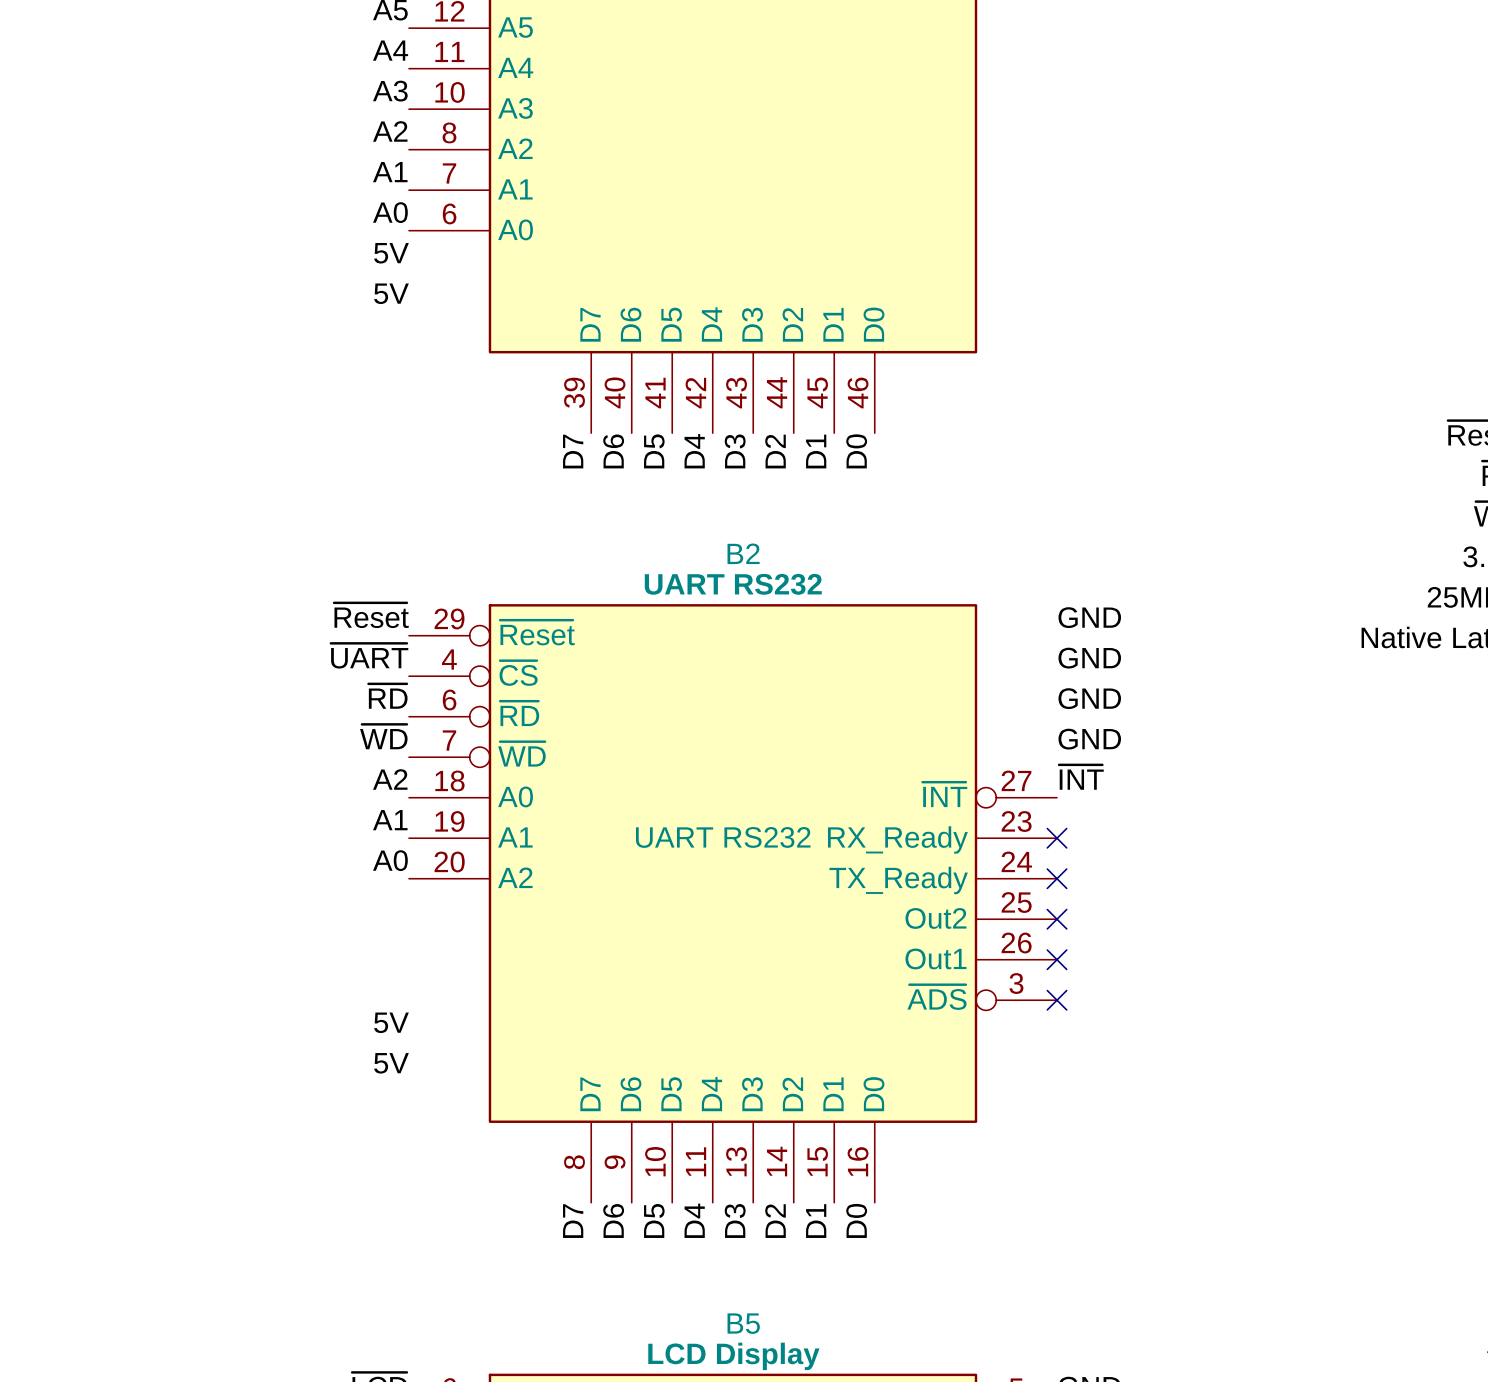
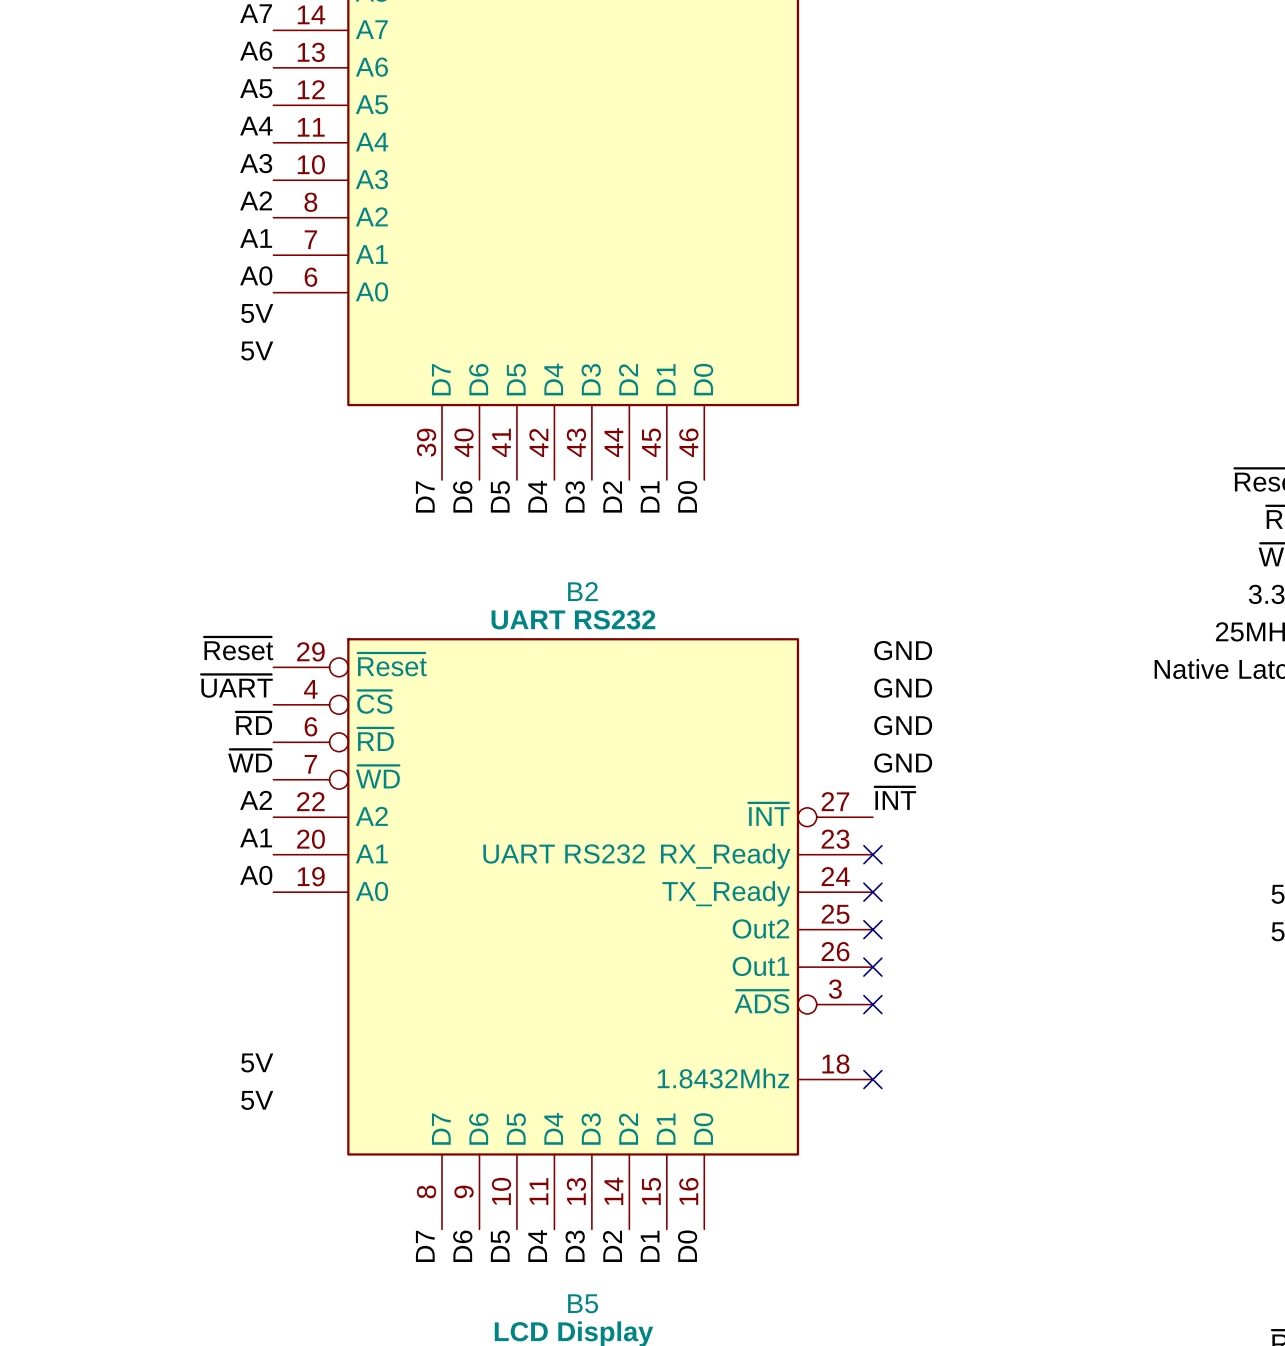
B2 symbol: [408, 604, 1058, 1203] -> [273, 638, 873, 1230]
label position: 5V (391, 1022) -> 5V (257, 1100)
no-connect mark: none -> (872, 1079)
label position: D5 (654, 1220) -> D5 (500, 1246)
label position: D4 (694, 1220) -> D4 (537, 1246)
label position: D0 (856, 1220) -> D0 (687, 1246)
label position: D7 (573, 1221) -> D7 (425, 1246)
label position: D6 (613, 1221) -> D6 (462, 1246)
label position: D3 (735, 1221) -> D3 (575, 1246)
label position: D2 (775, 1221) -> D2 (612, 1246)
label position: D1 (816, 1221) -> D1 (650, 1246)

